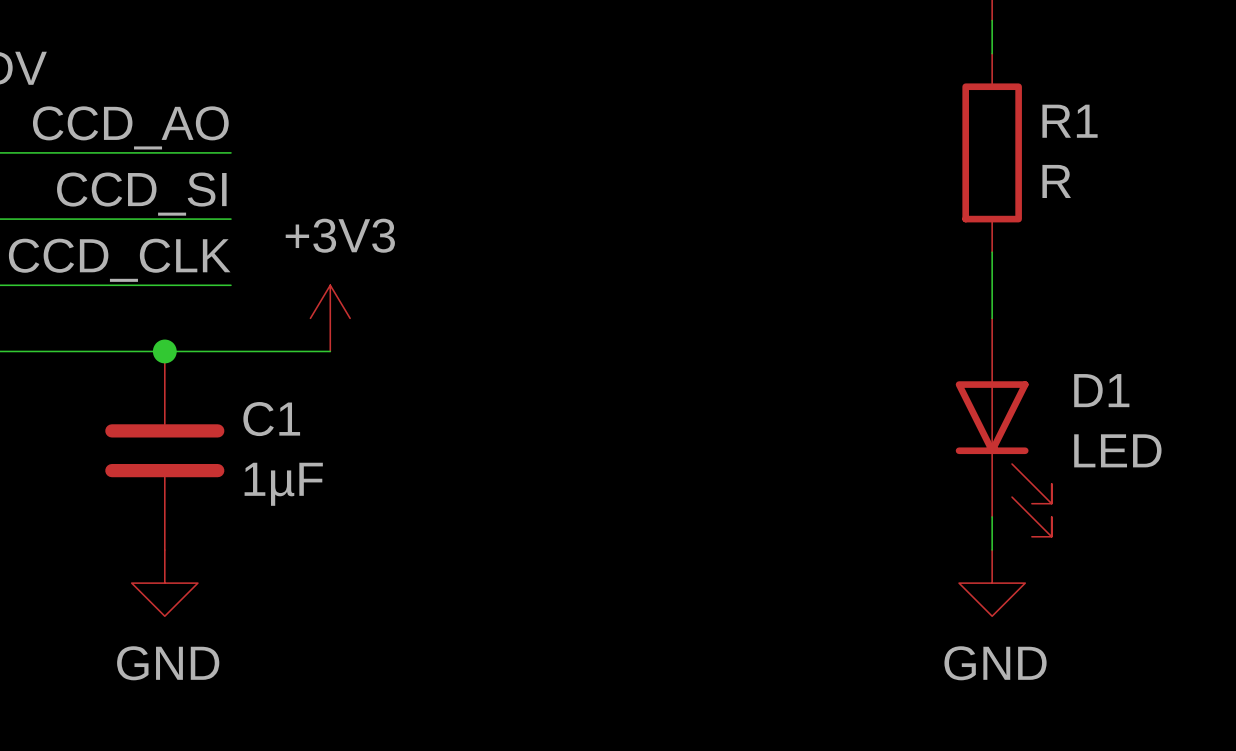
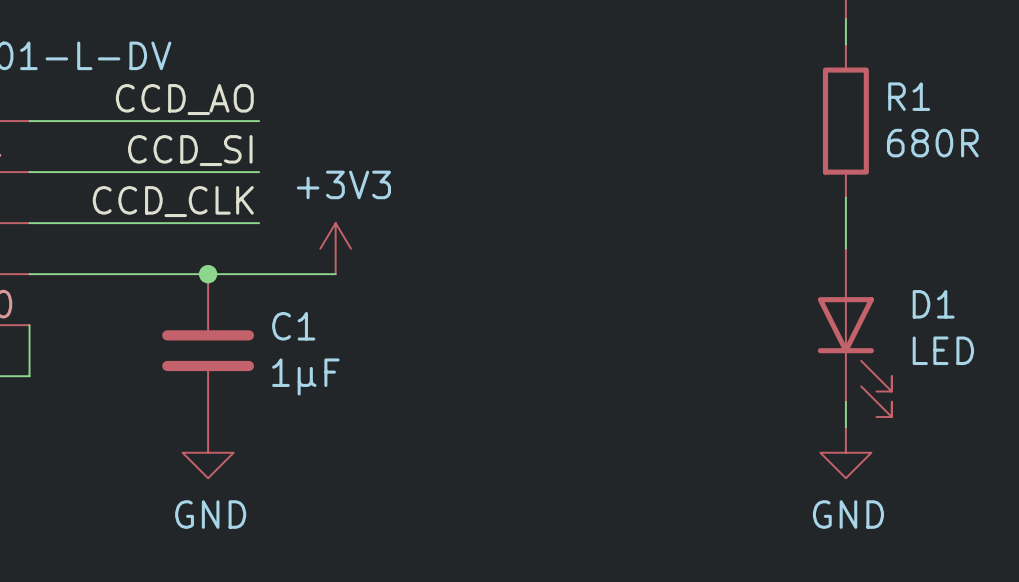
R1 value: R (1056, 181) -> 680R (932, 143)

